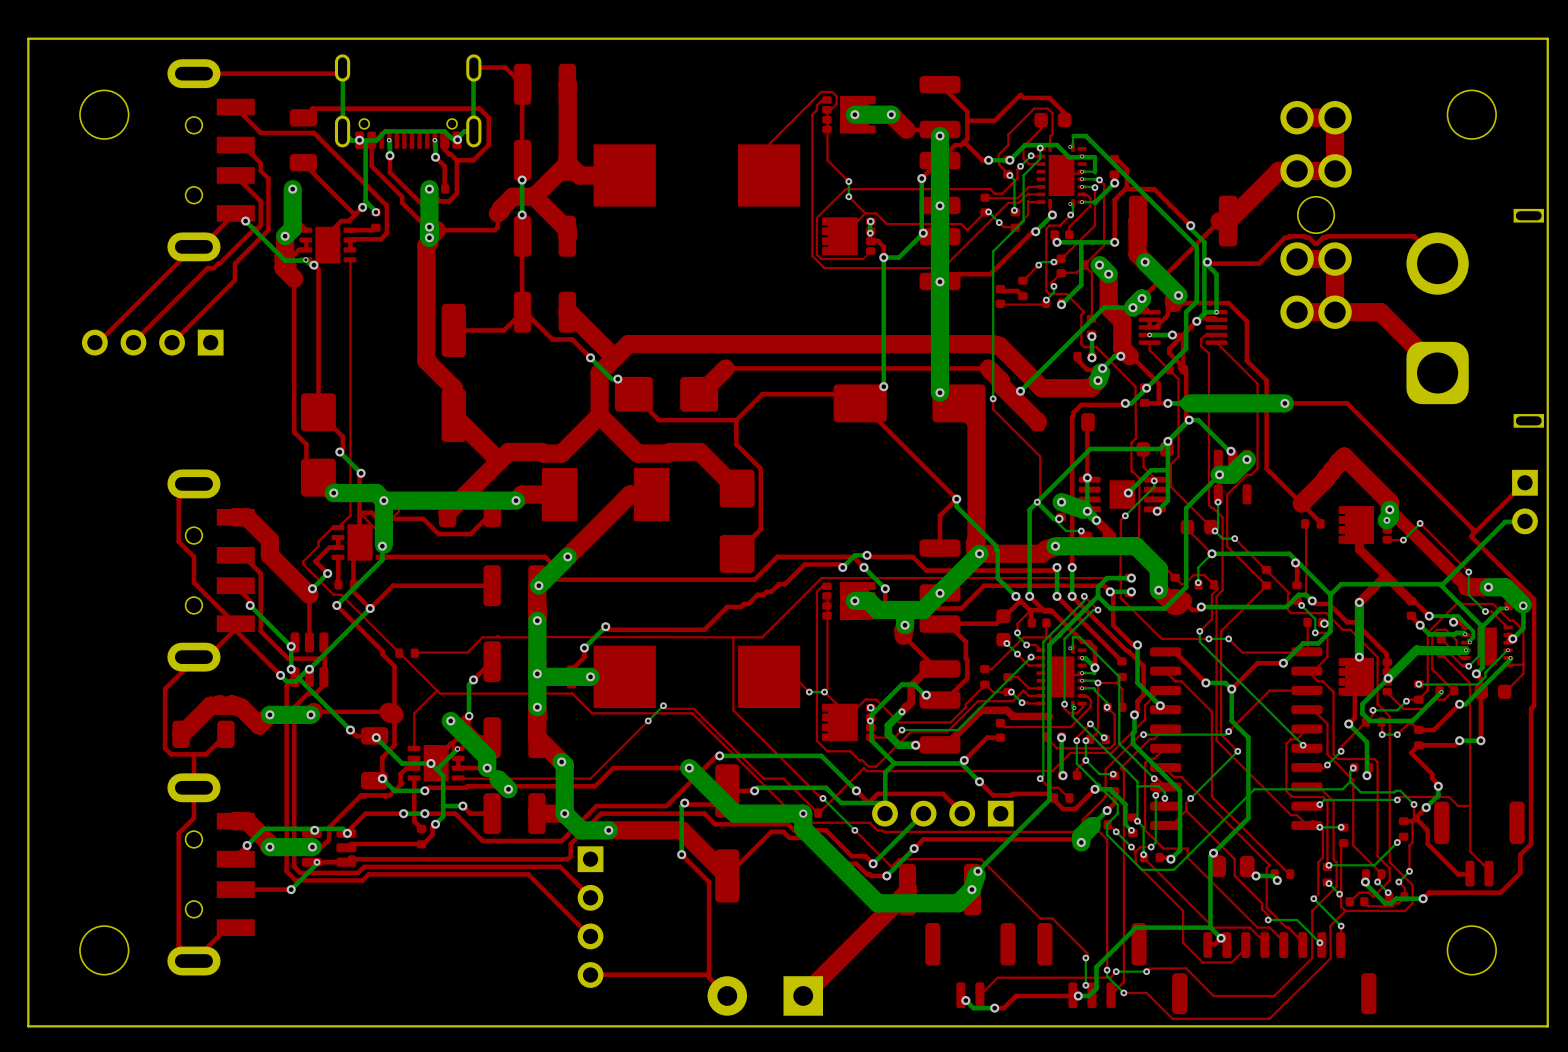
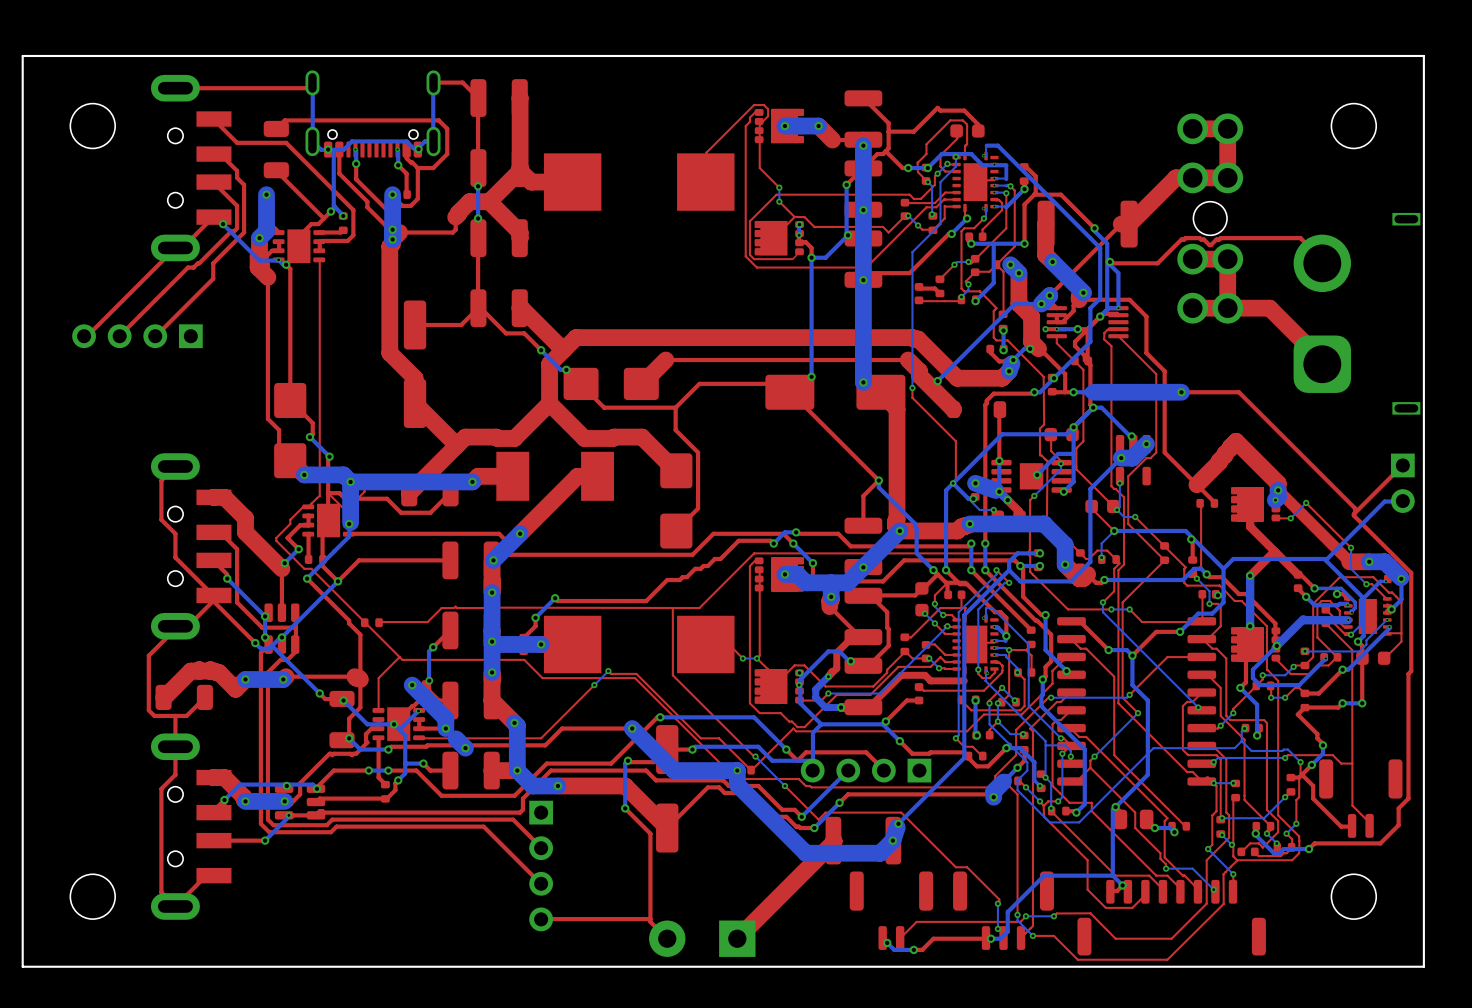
via: none -> (1045, 329)

